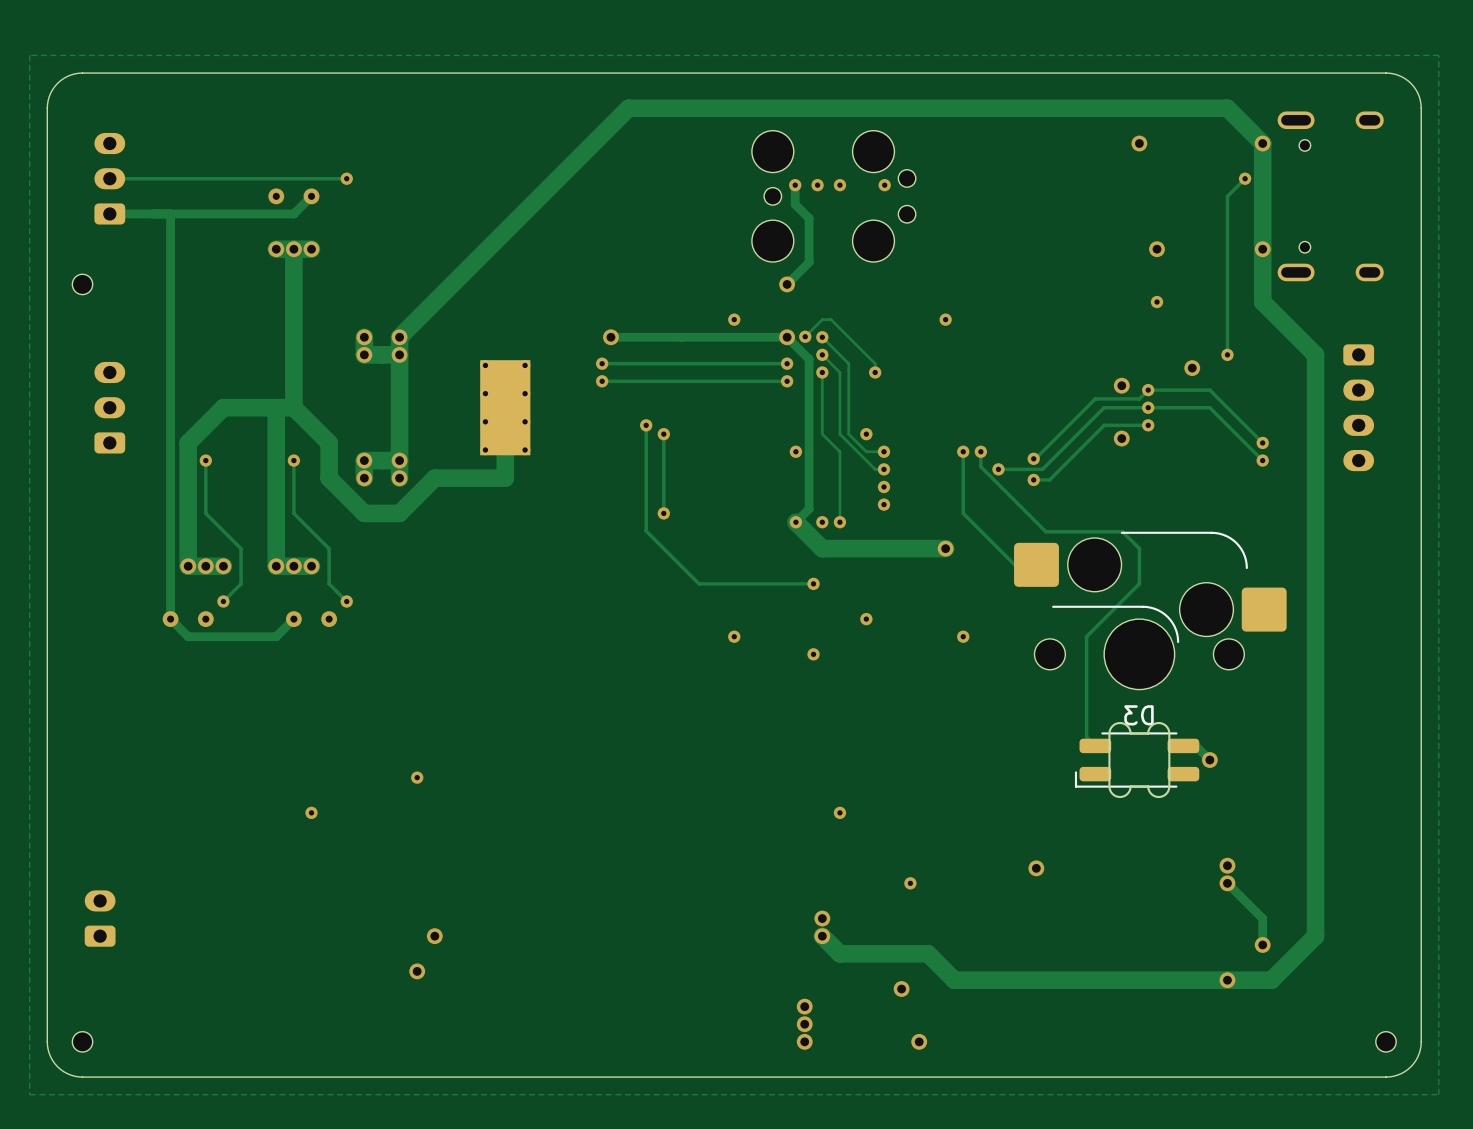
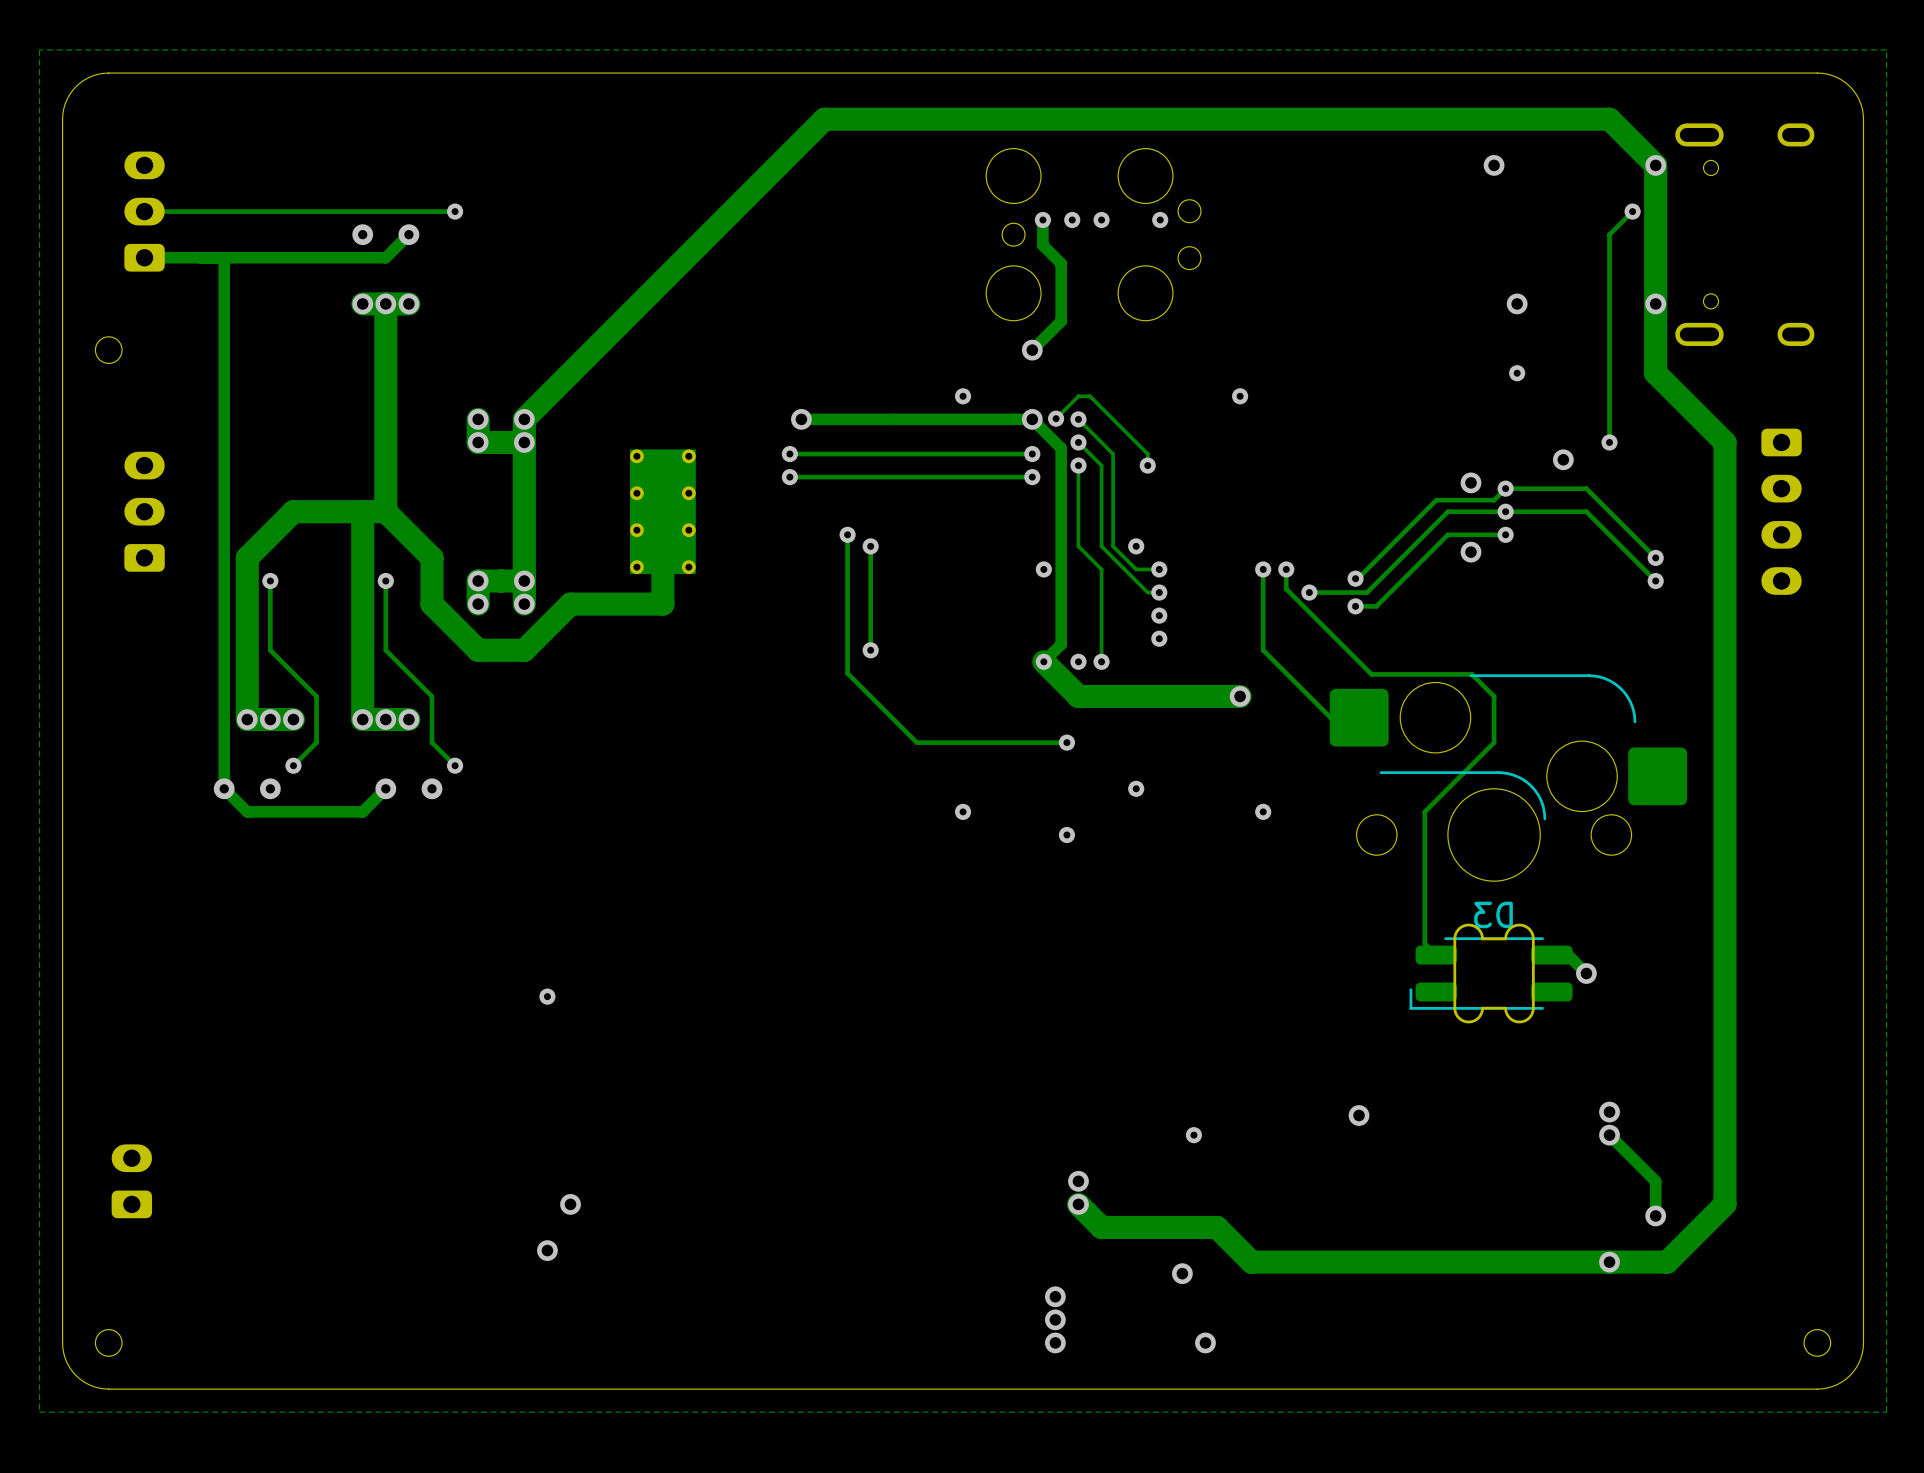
via: (311, 812) -> none
via: (839, 812) -> none

